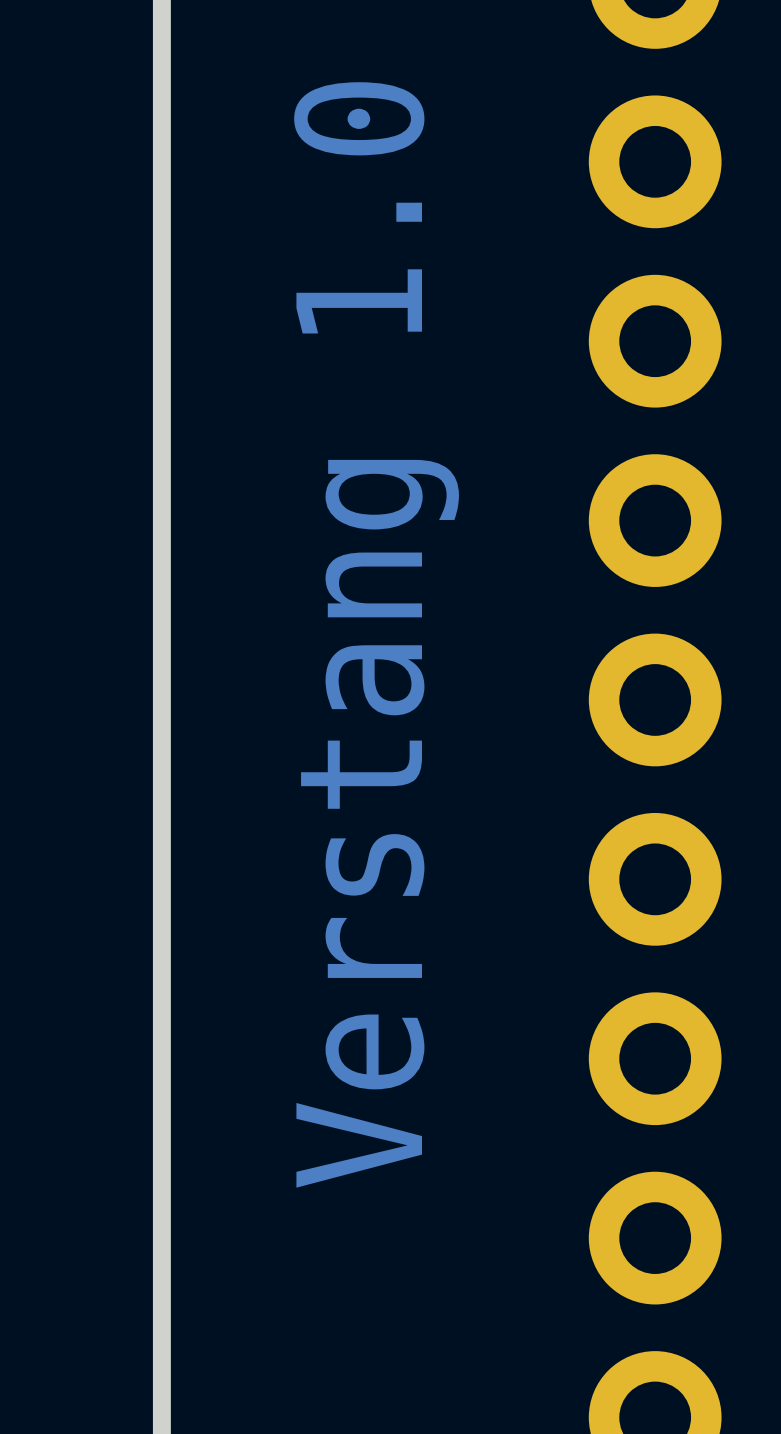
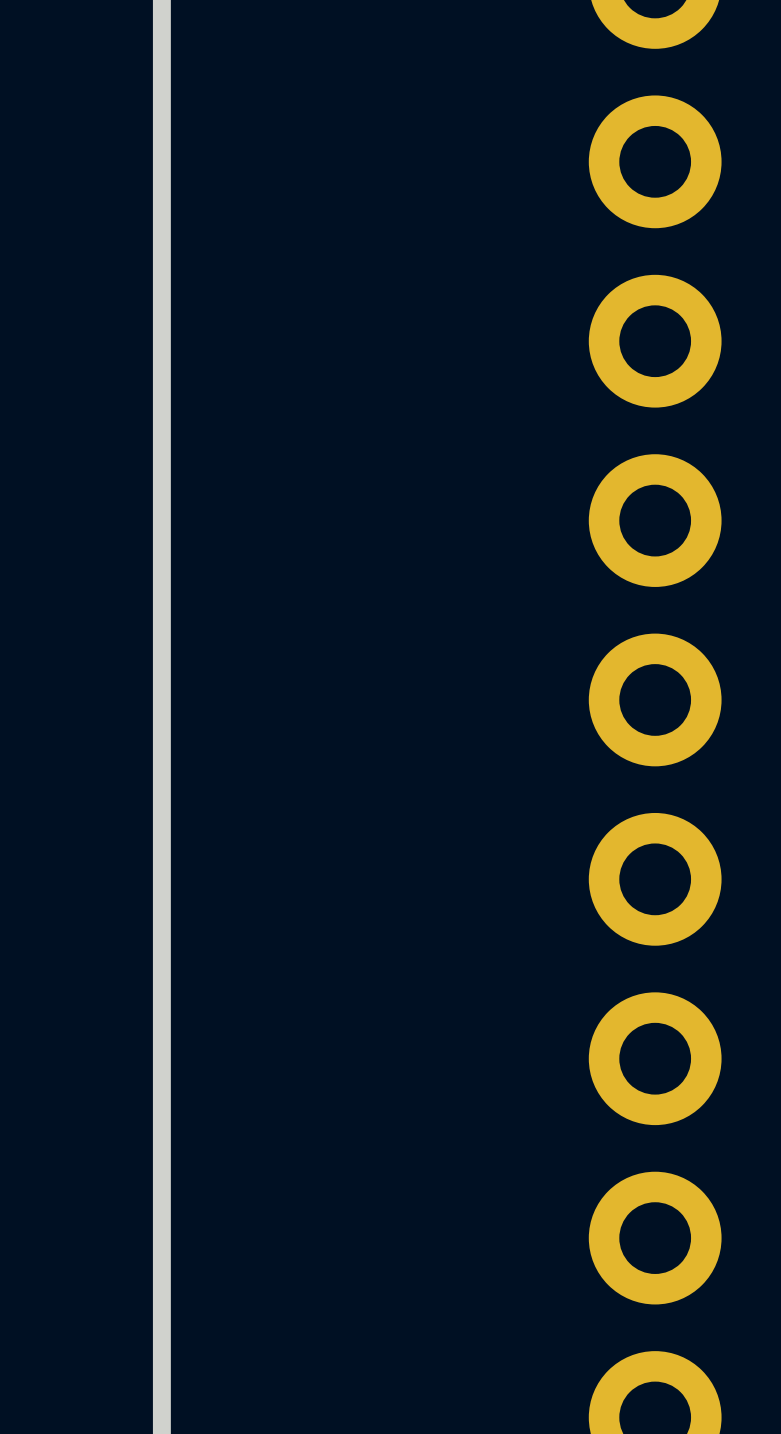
text: Verstang 1.0 (376, 634) -> none

